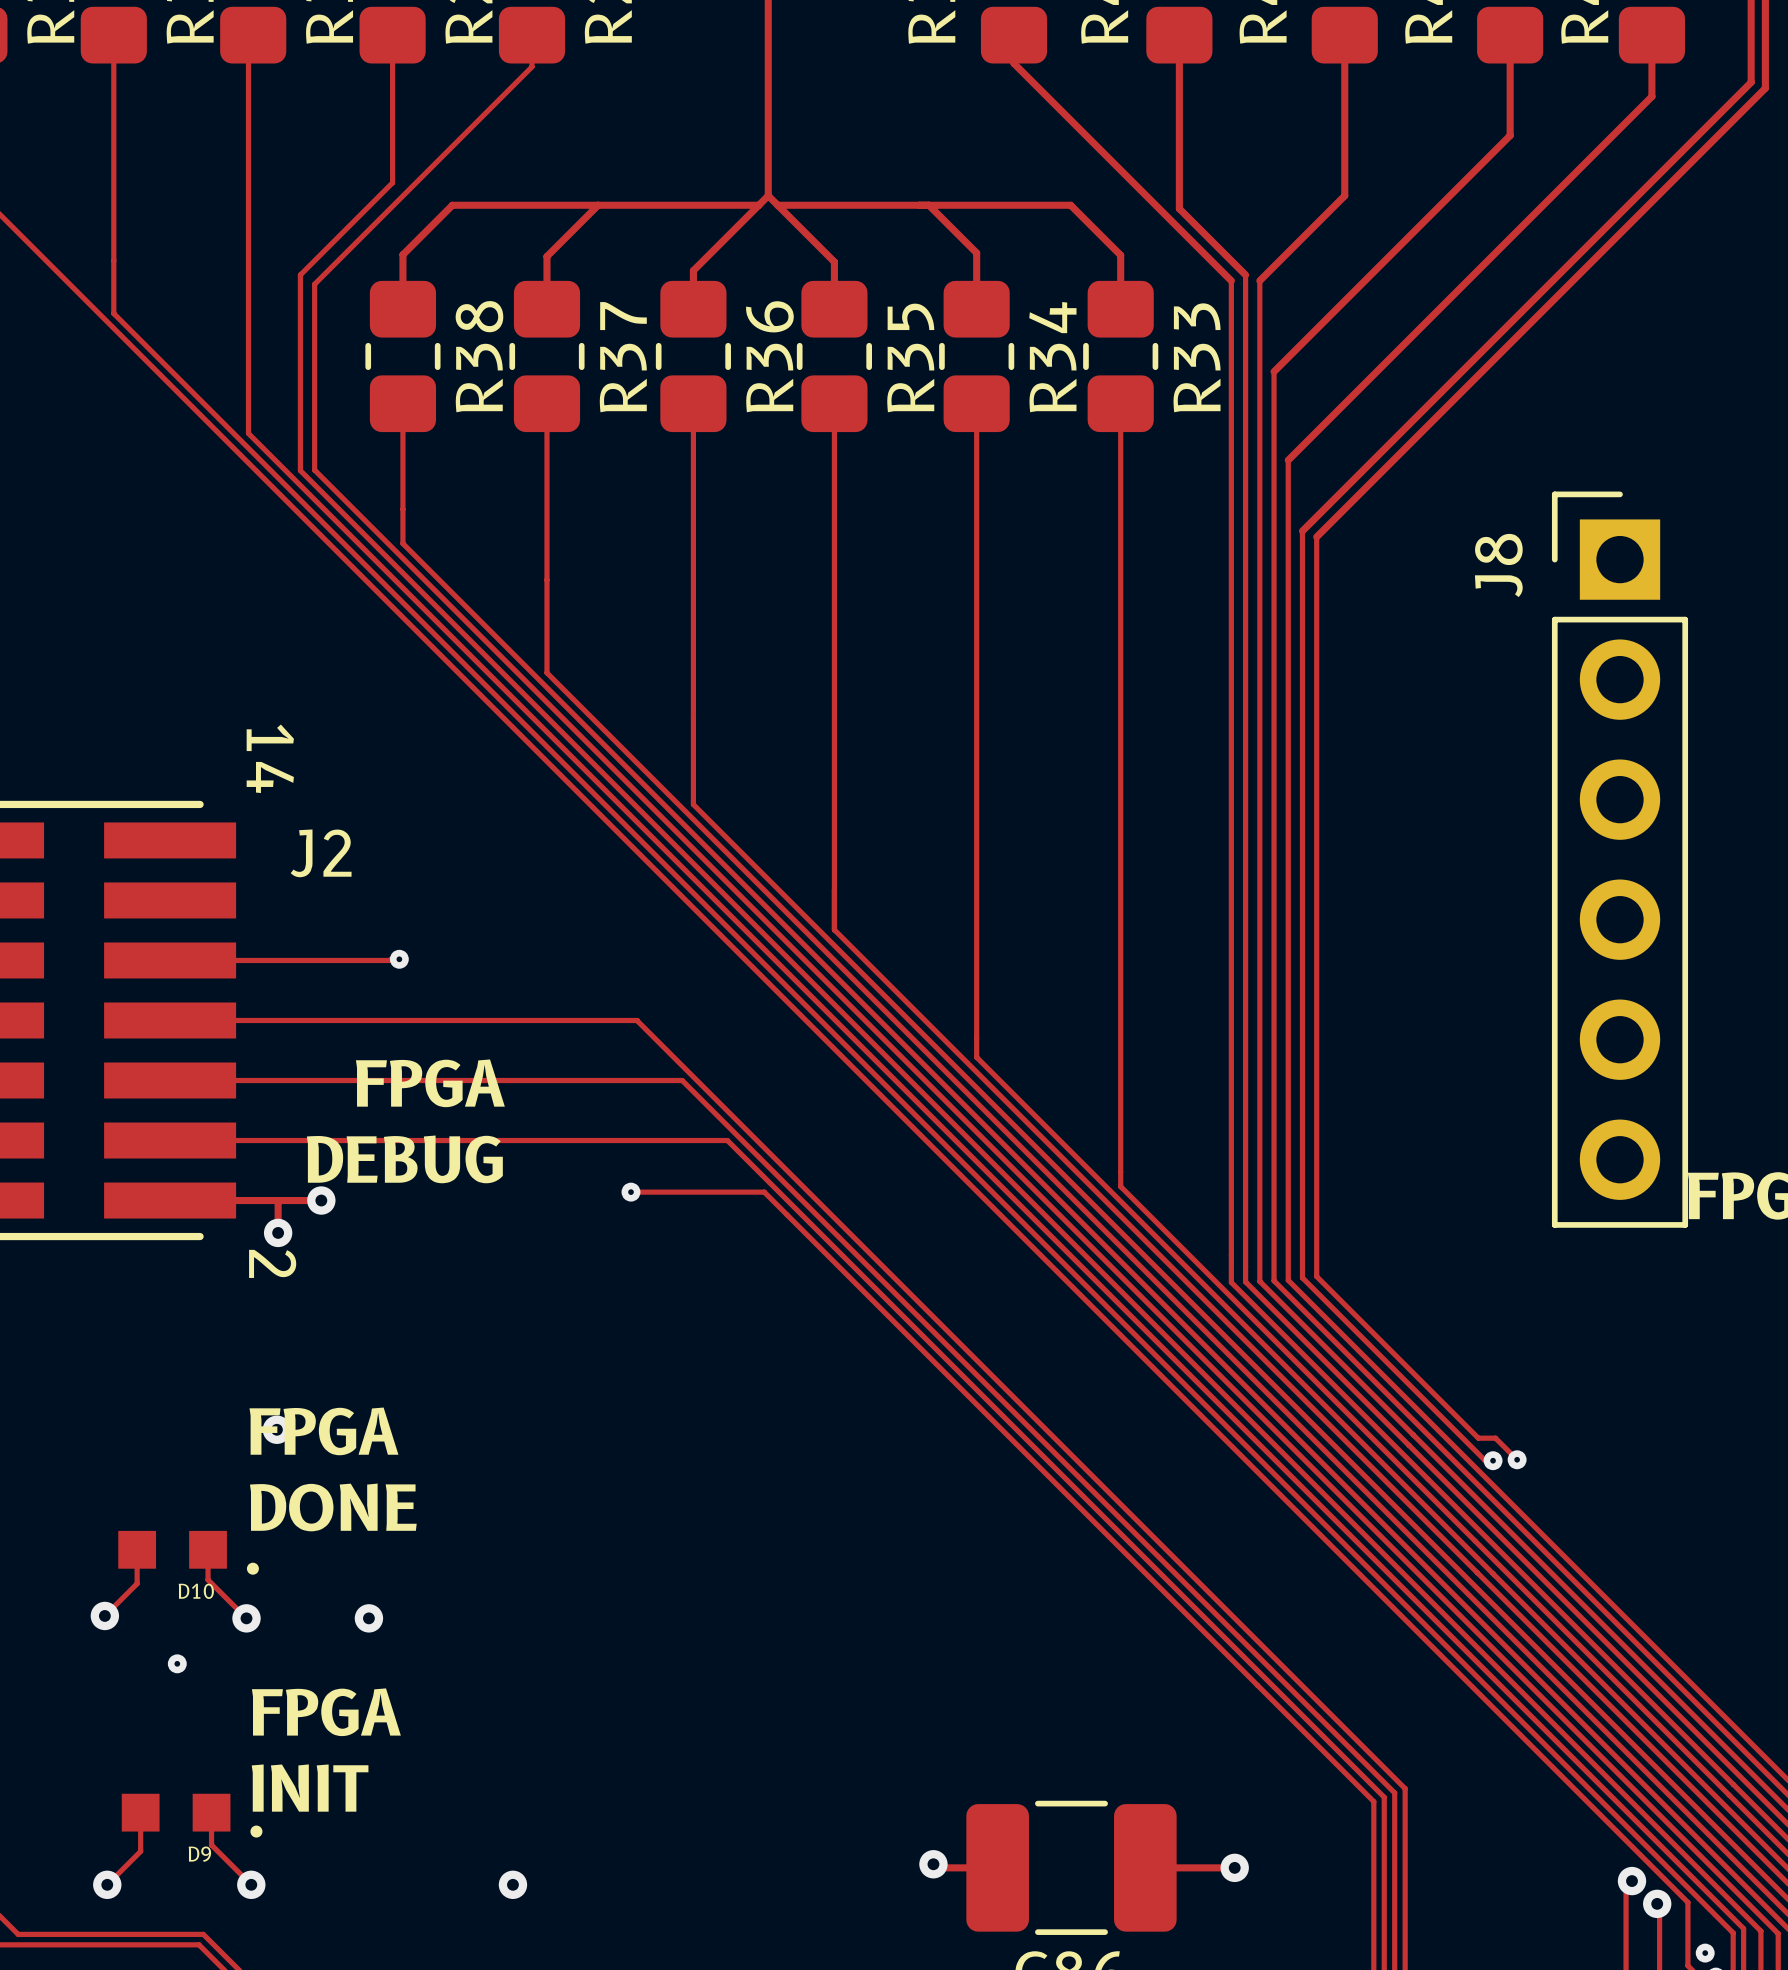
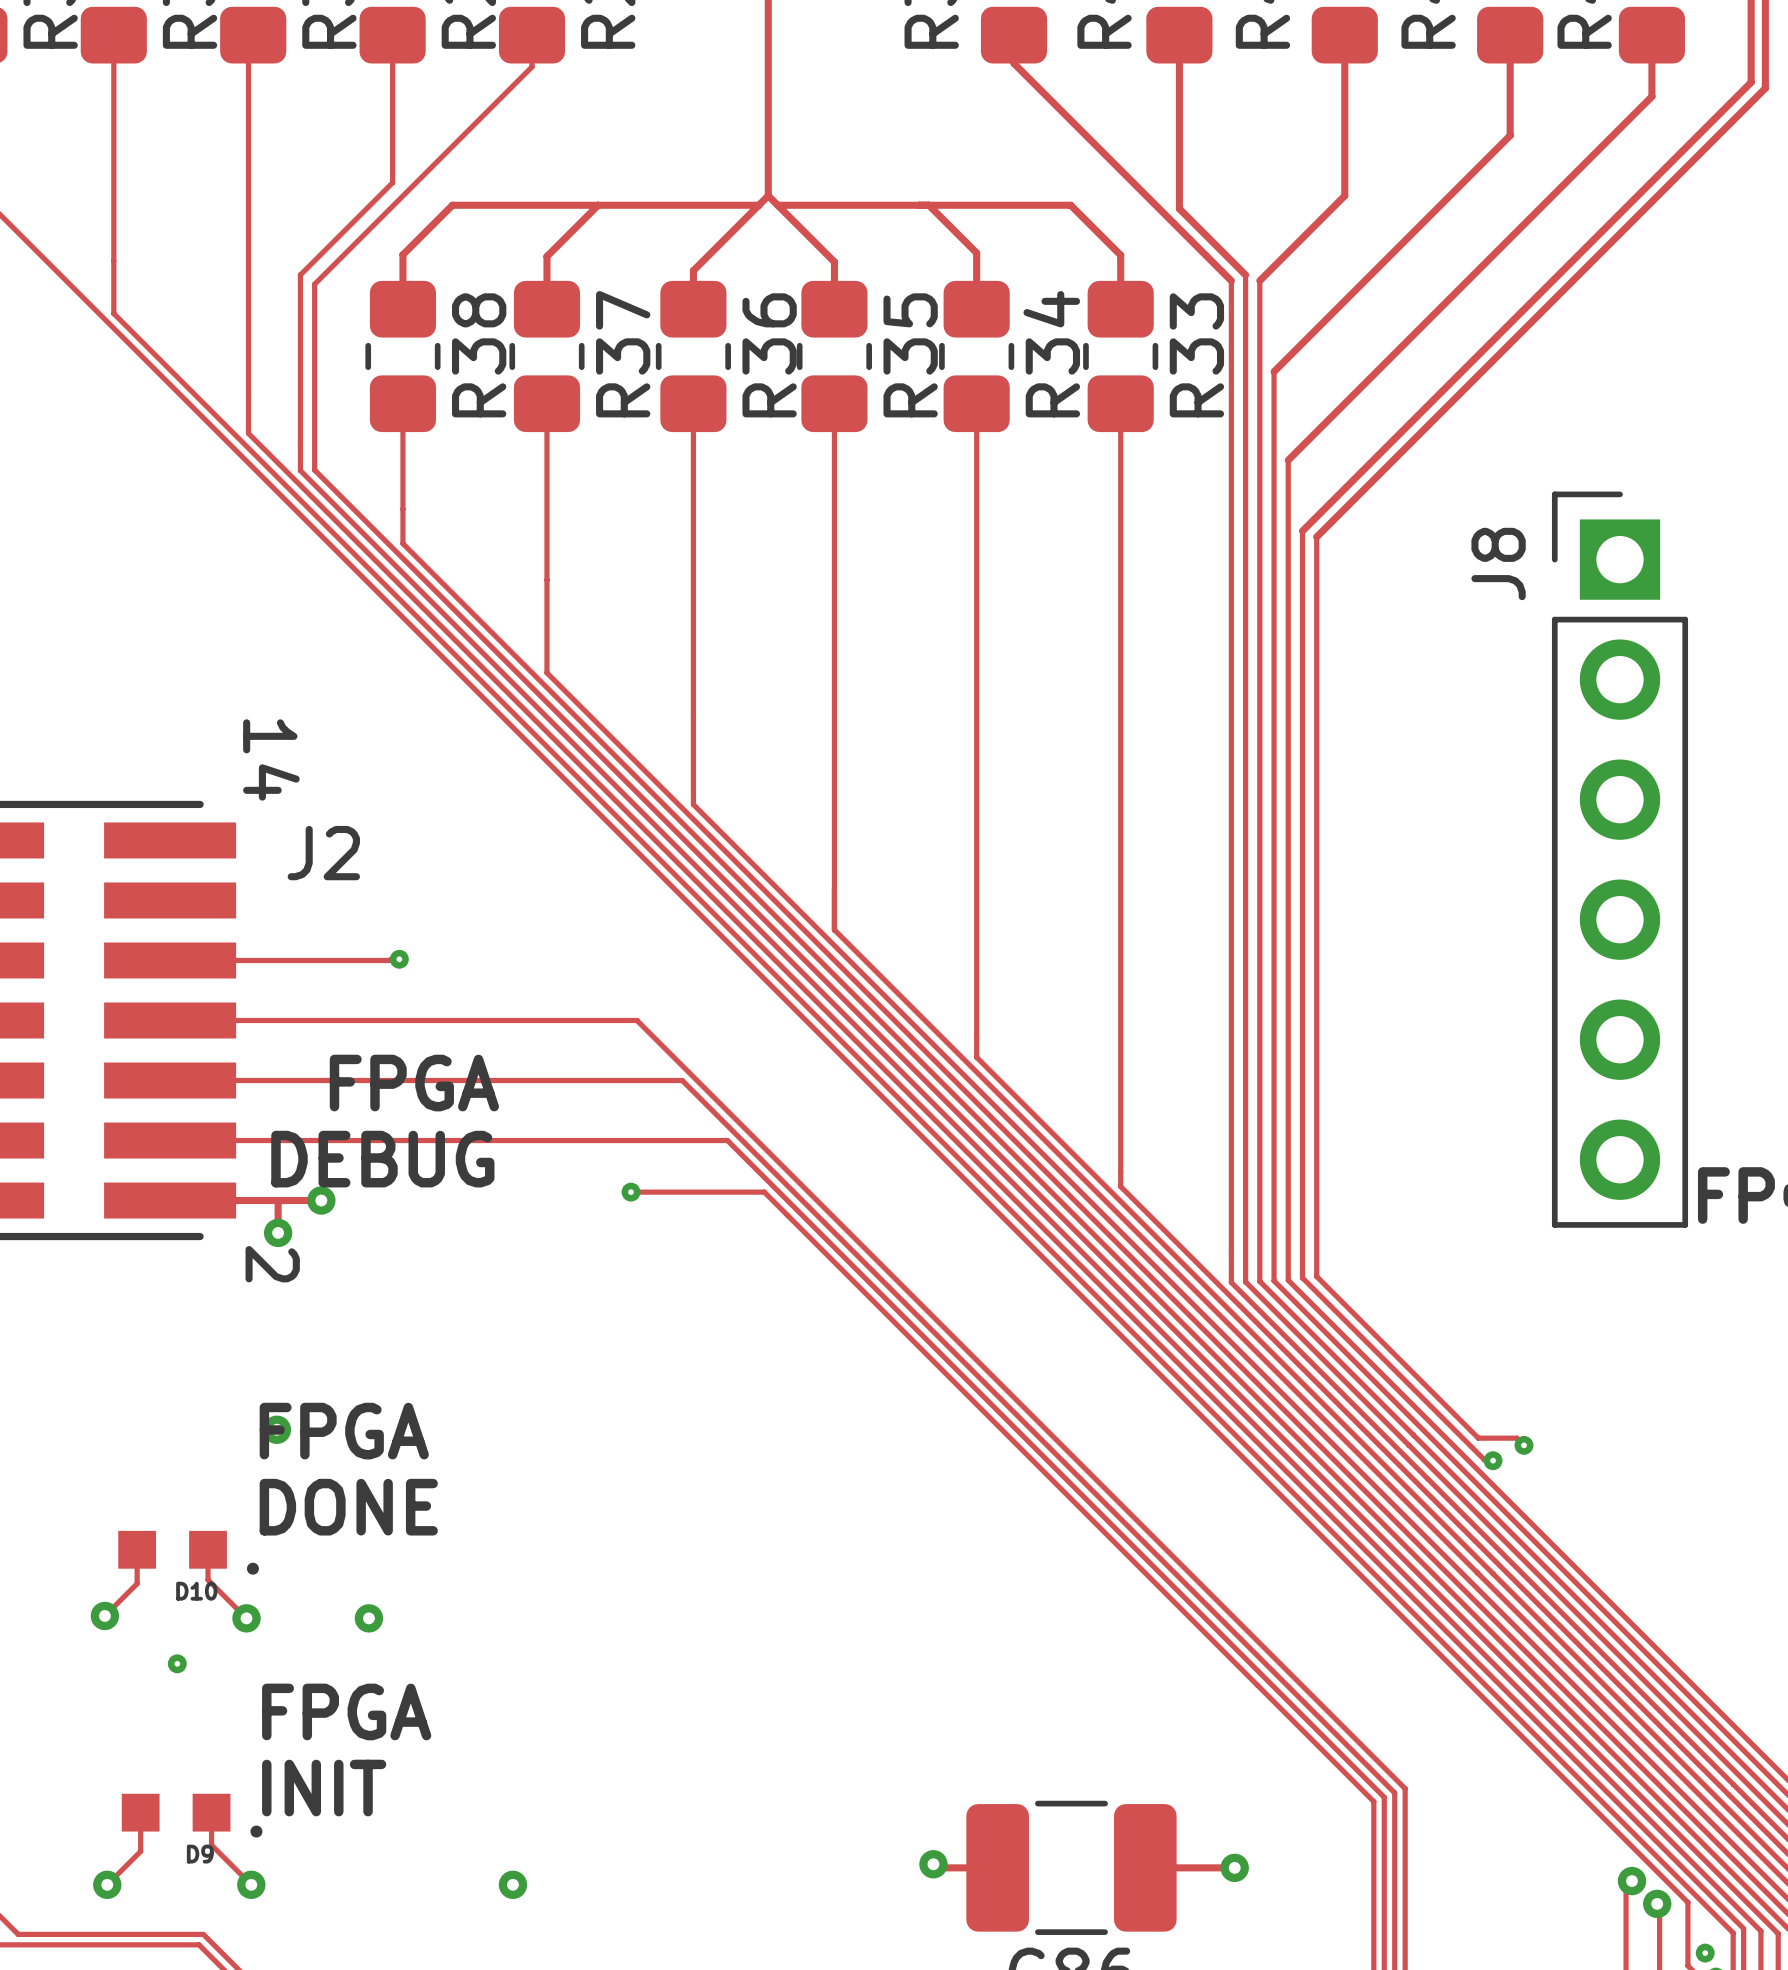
track: (1495, 1438) (1517, 1459) -> (1495, 1438) (1516, 1438) (1523, 1445)
via position: (1517, 1459) -> (1523, 1445)

